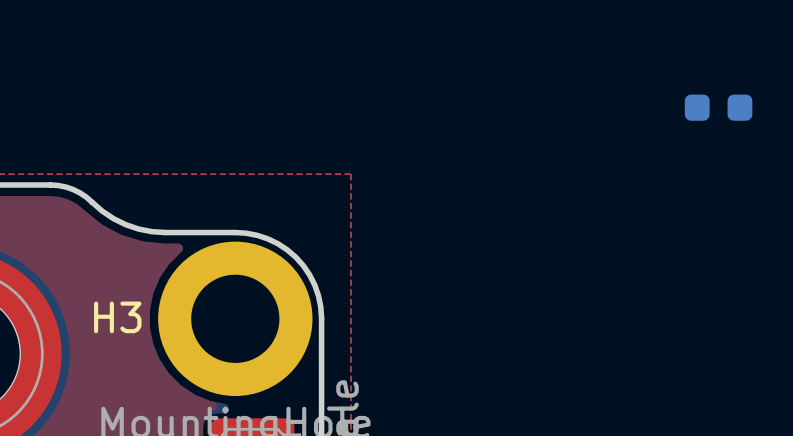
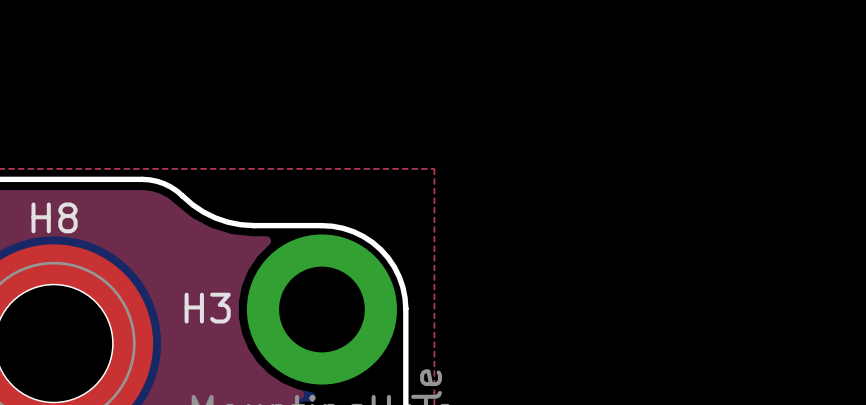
part: (718, 107) -> none

